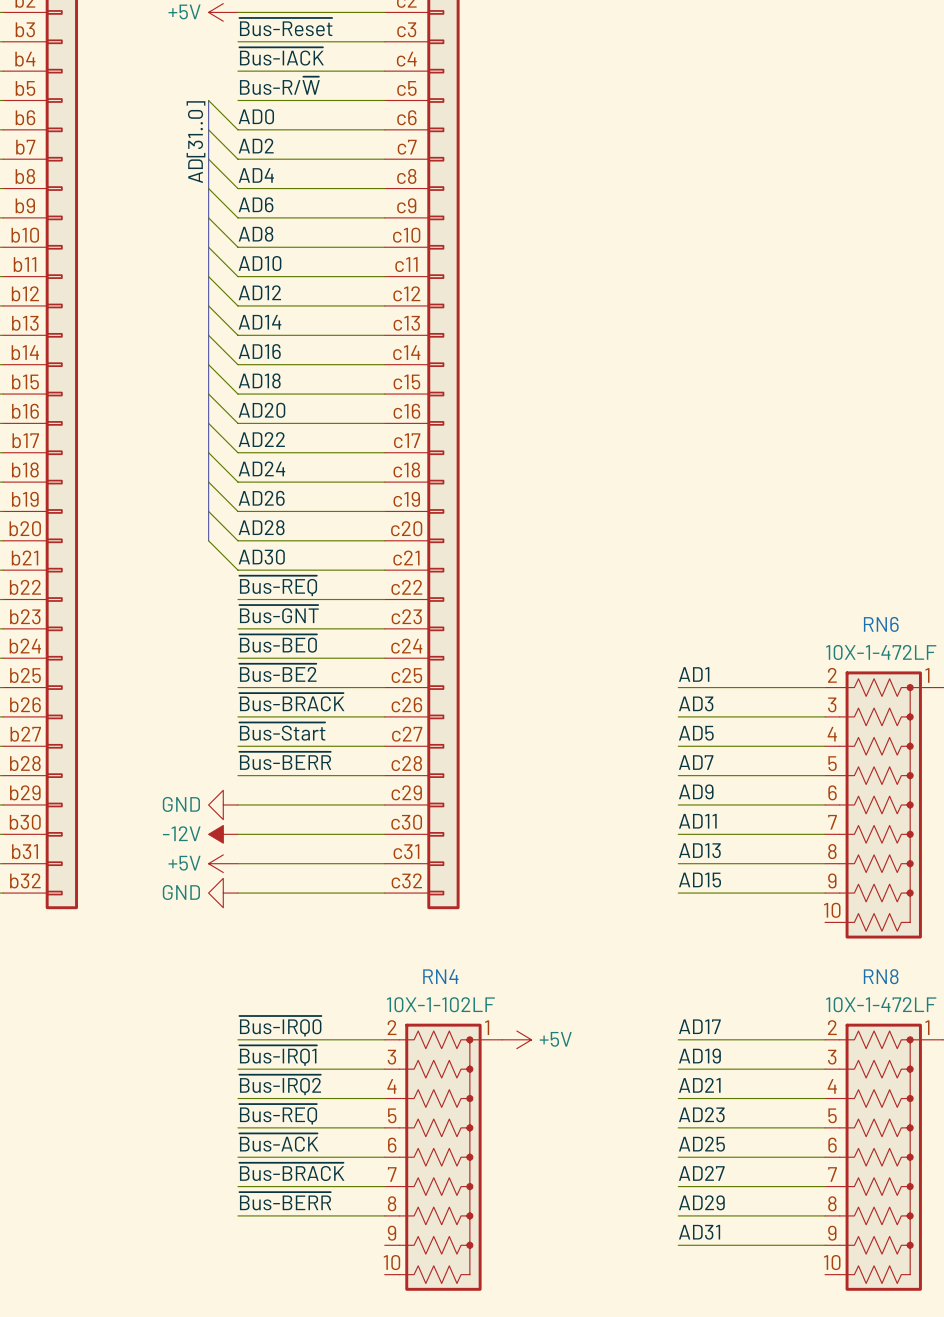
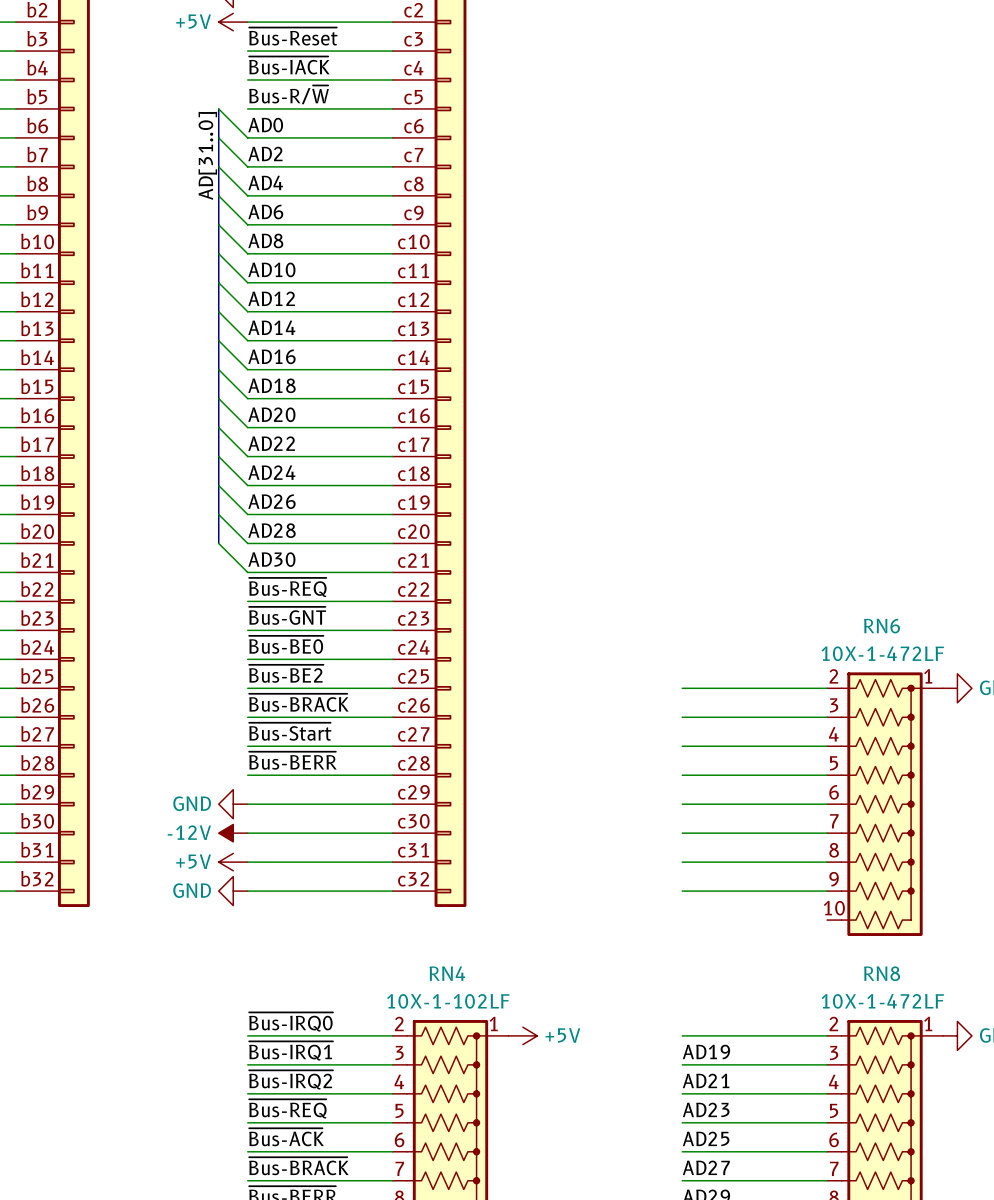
label: AD1 (694, 674) -> none
label: AD3 (696, 703) -> none
label: AD5 (696, 733) -> none
label: AD7 (696, 762) -> none
label: AD9 (696, 791) -> none
label: AD11 (697, 821) -> none
label: AD13 (699, 850) -> none
label: AD15 (700, 880) -> none
label: AD17 (699, 1026) -> none

